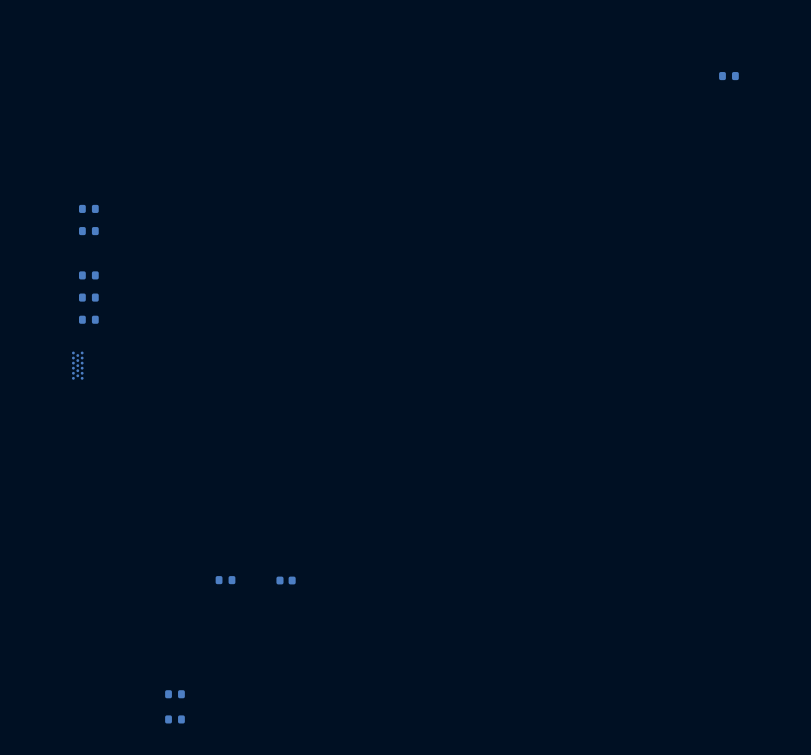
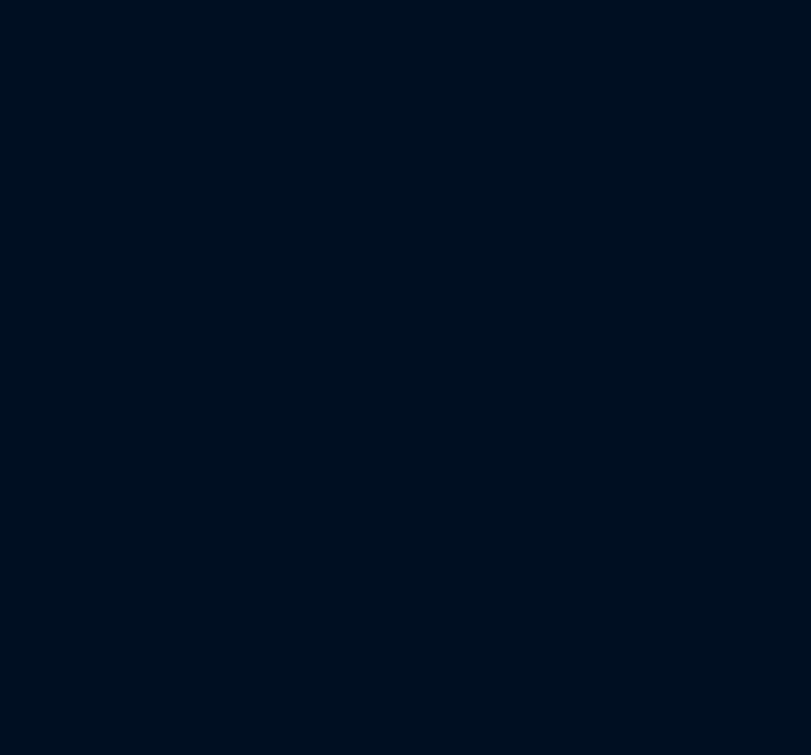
part: (728, 76) -> none
part: (88, 208) -> none
part: (88, 231) -> none
part: (88, 275) -> none
part: (88, 297) -> none
part: (88, 319) -> none
part: (77, 365) -> none
part: (225, 580) -> none
part: (286, 580) -> none
part: (174, 694) -> none
part: (174, 719) -> none

